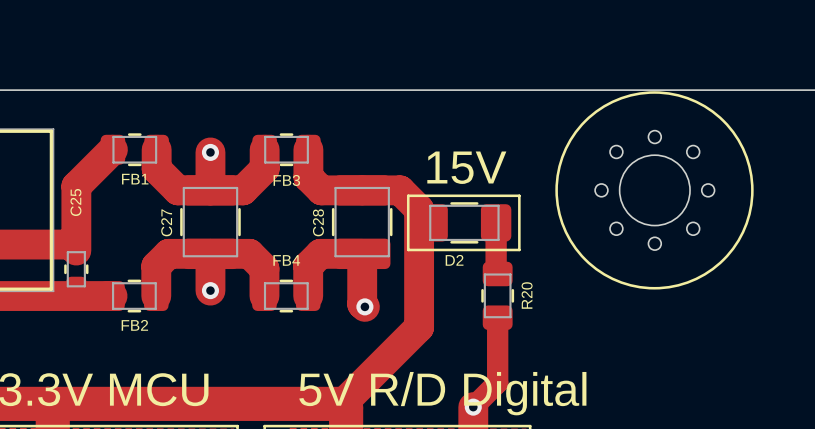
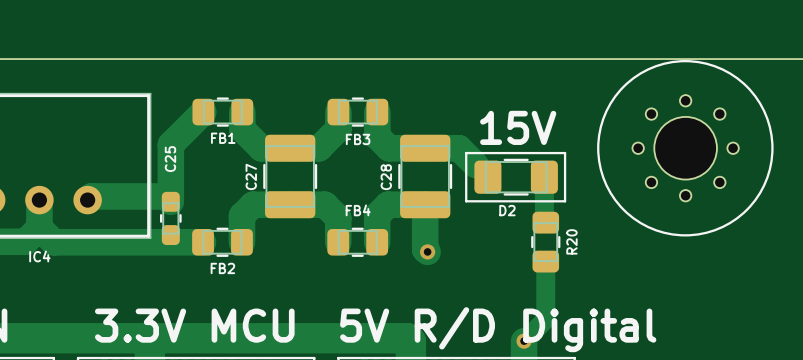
track: (210, 152) (210, 190) -> none
via: (210, 152) -> none
track: (419, 209) (419, 327) (342, 403) -> none
track: (210, 253) (210, 290) -> none
via: (210, 290) -> none

